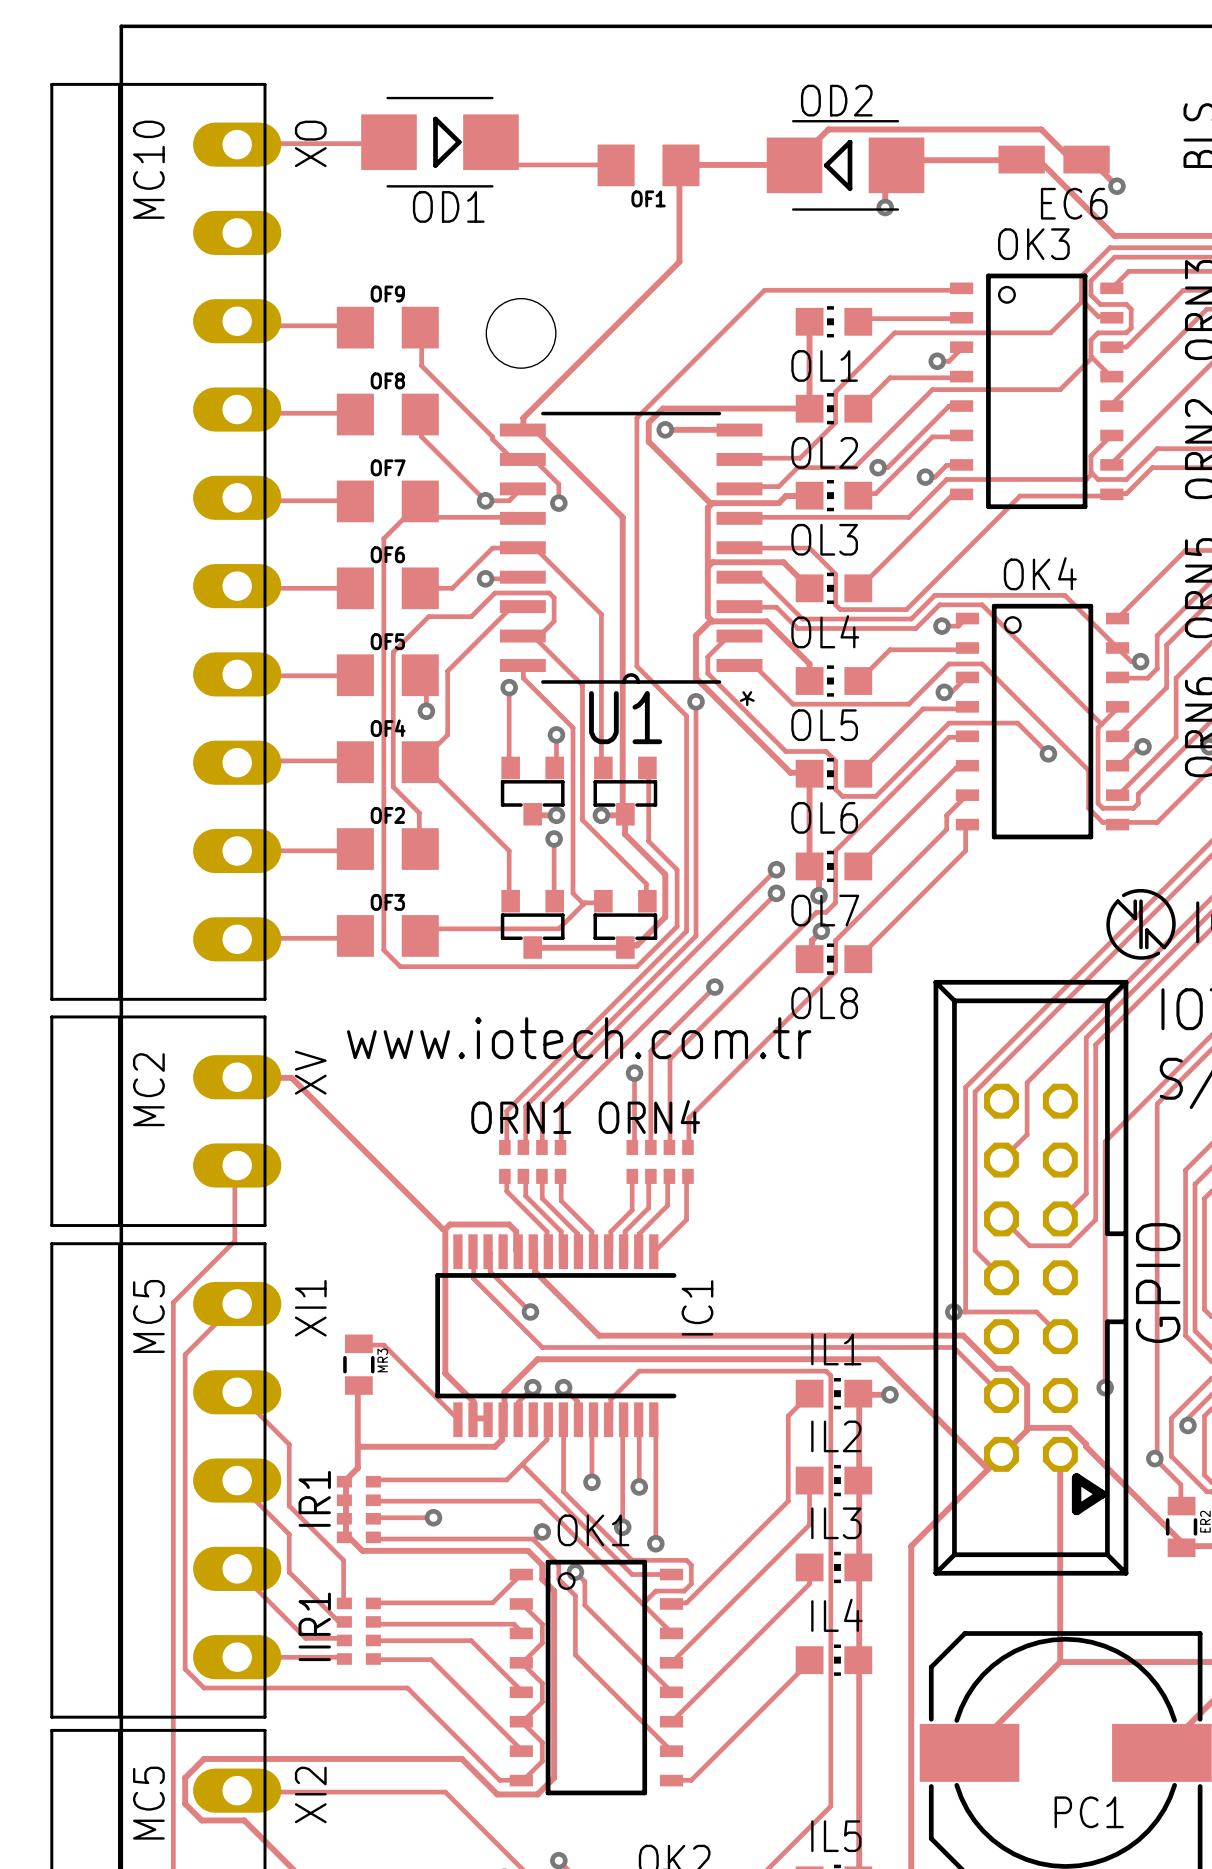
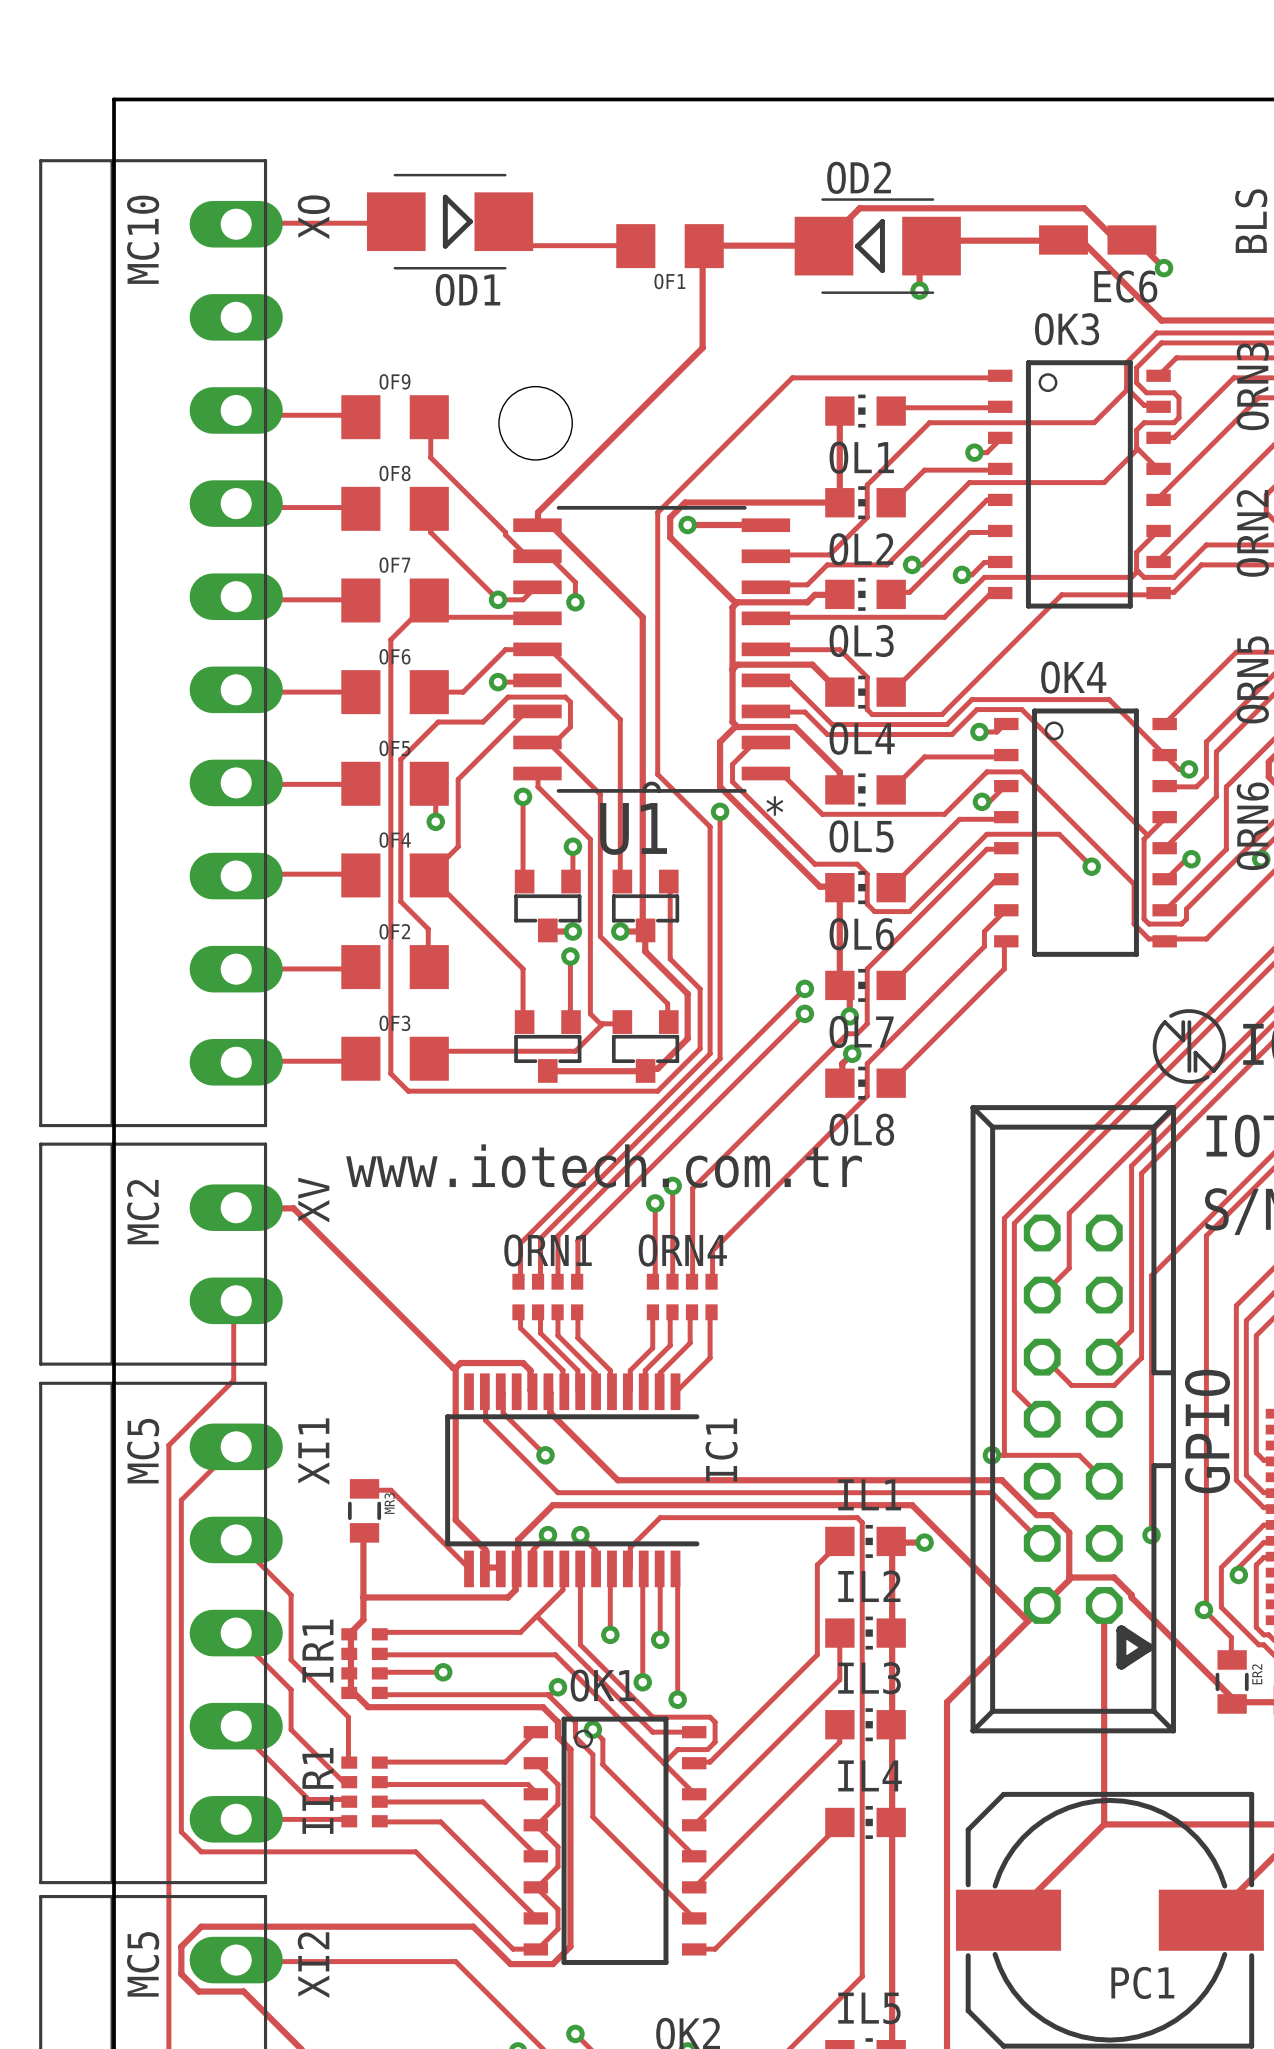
track: (714, 987) (650, 1050) (650, 1147) -> (672, 1185) (672, 1281)
via position: (714, 987) -> (672, 1185)

